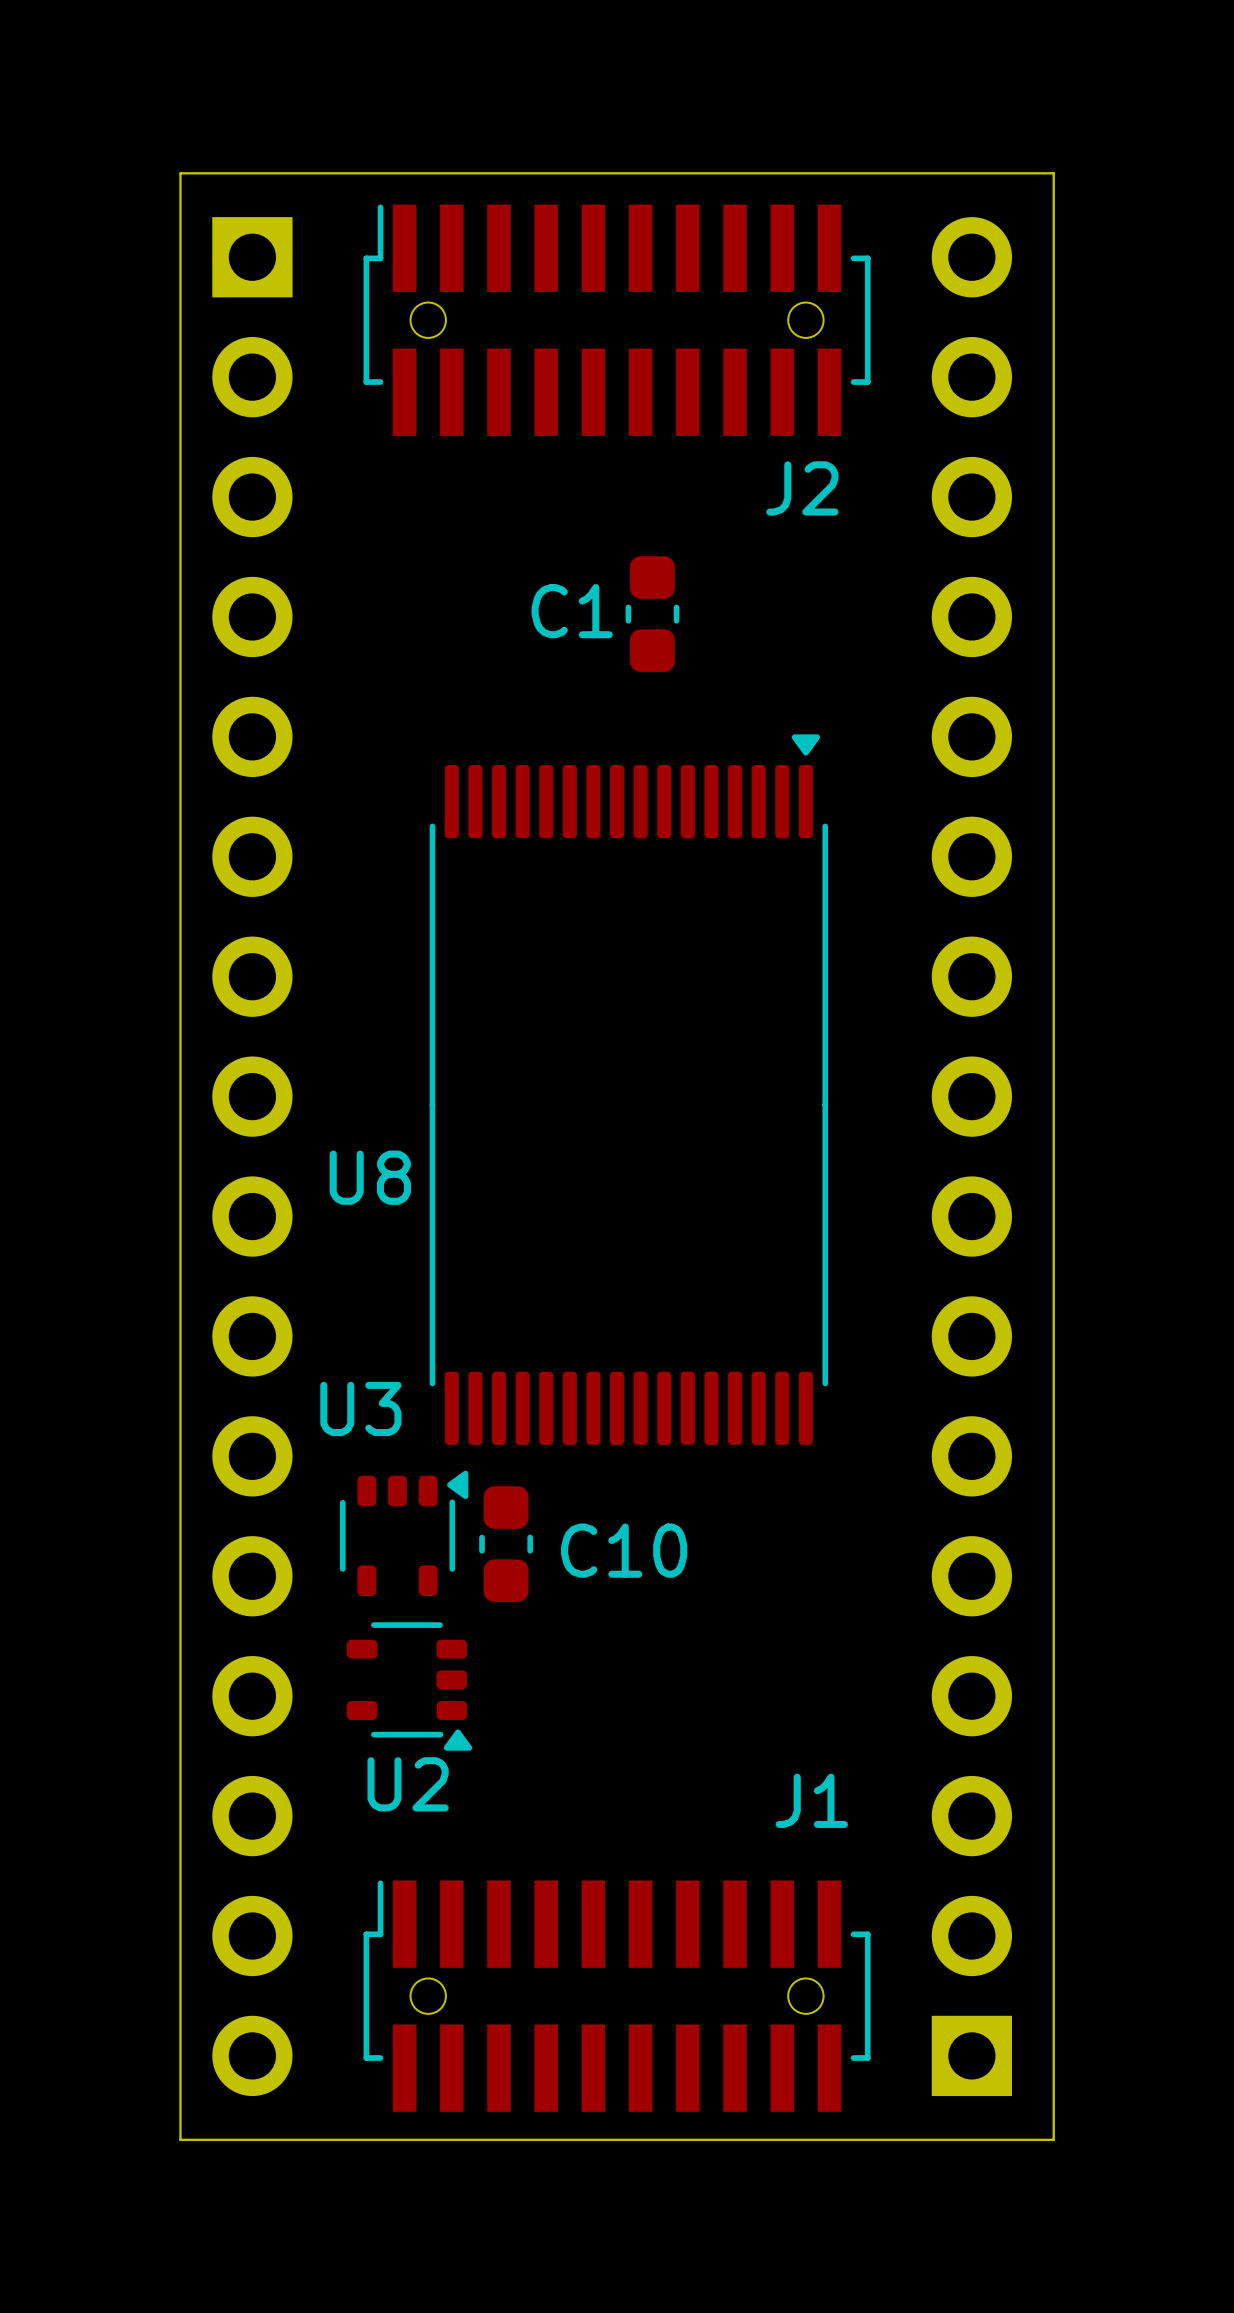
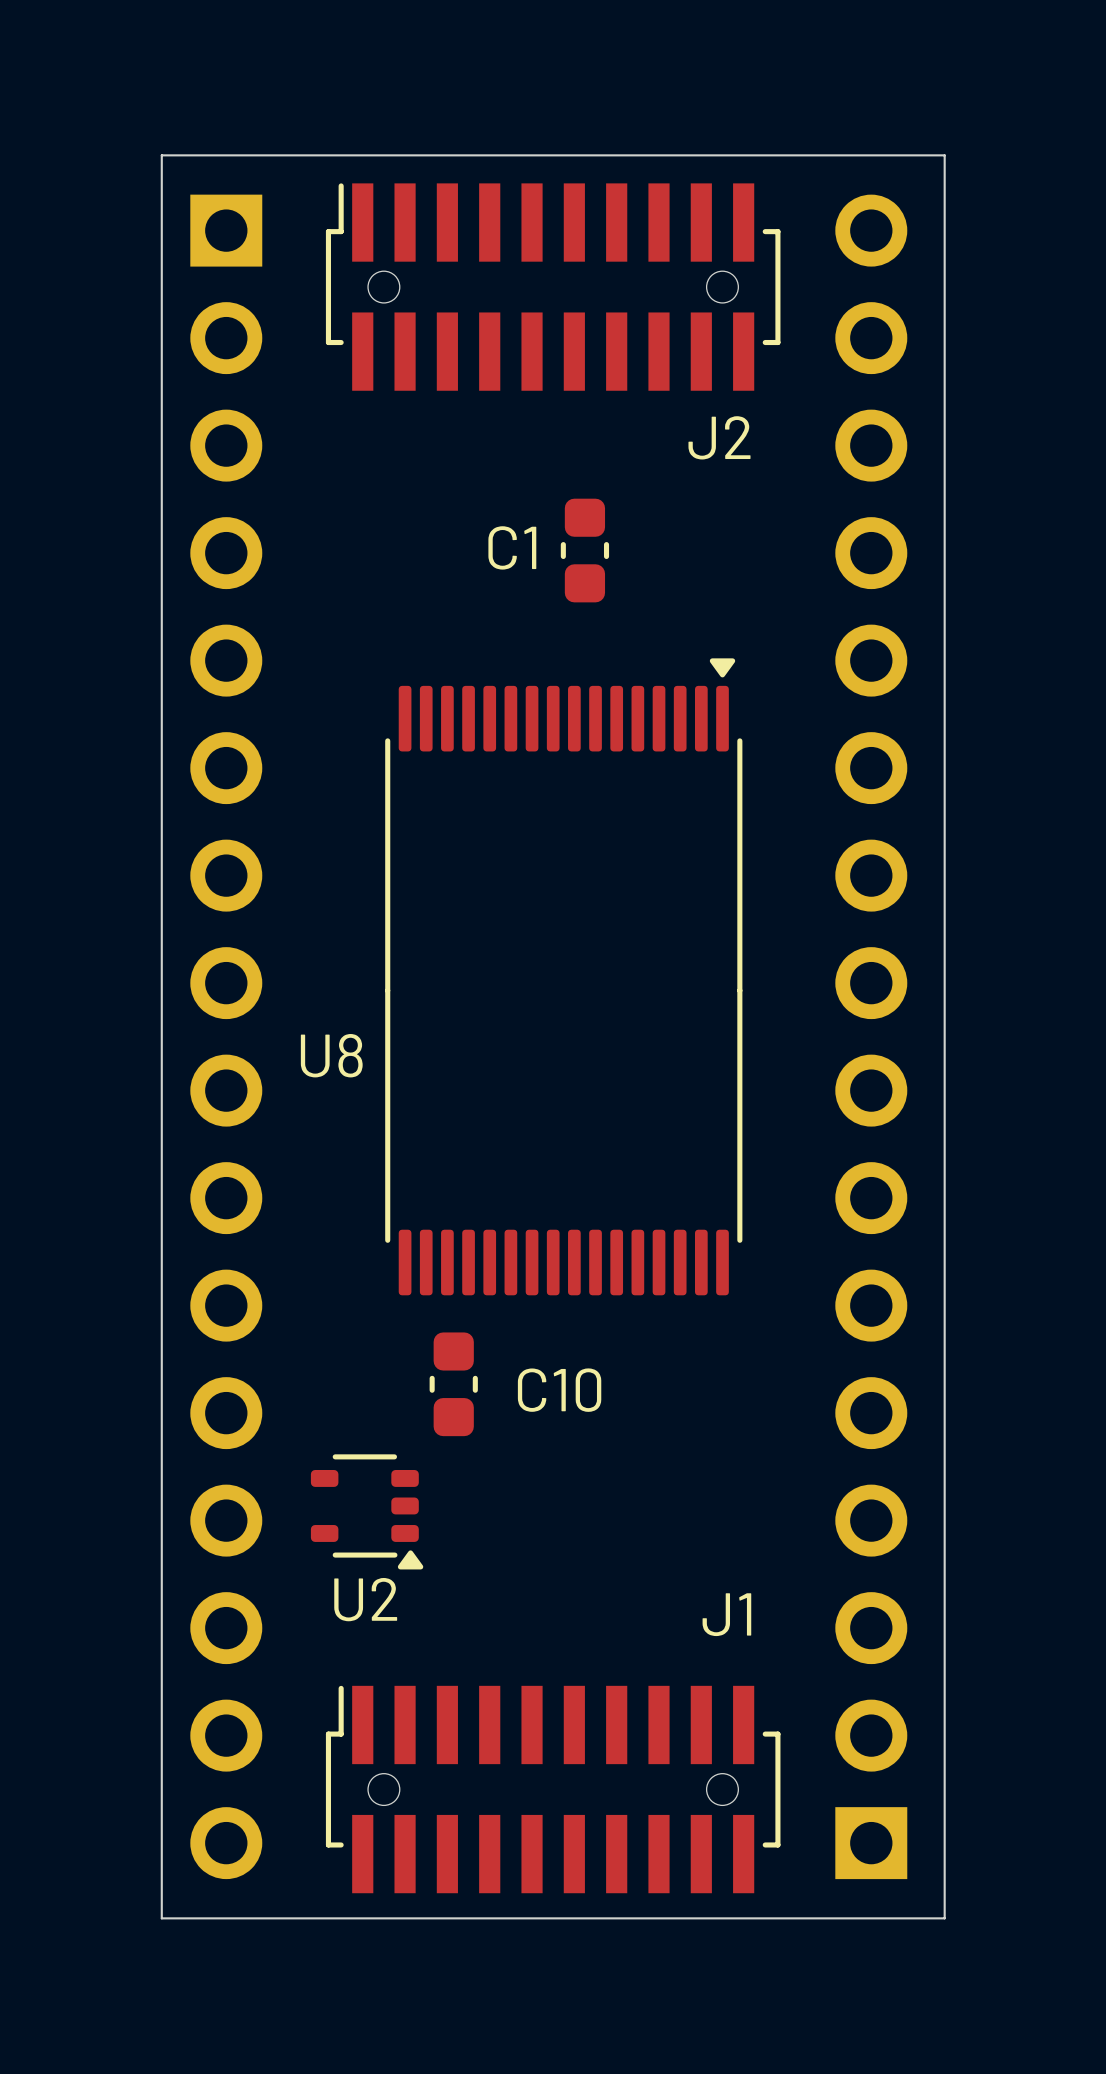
U3: (404, 1533) -> none

